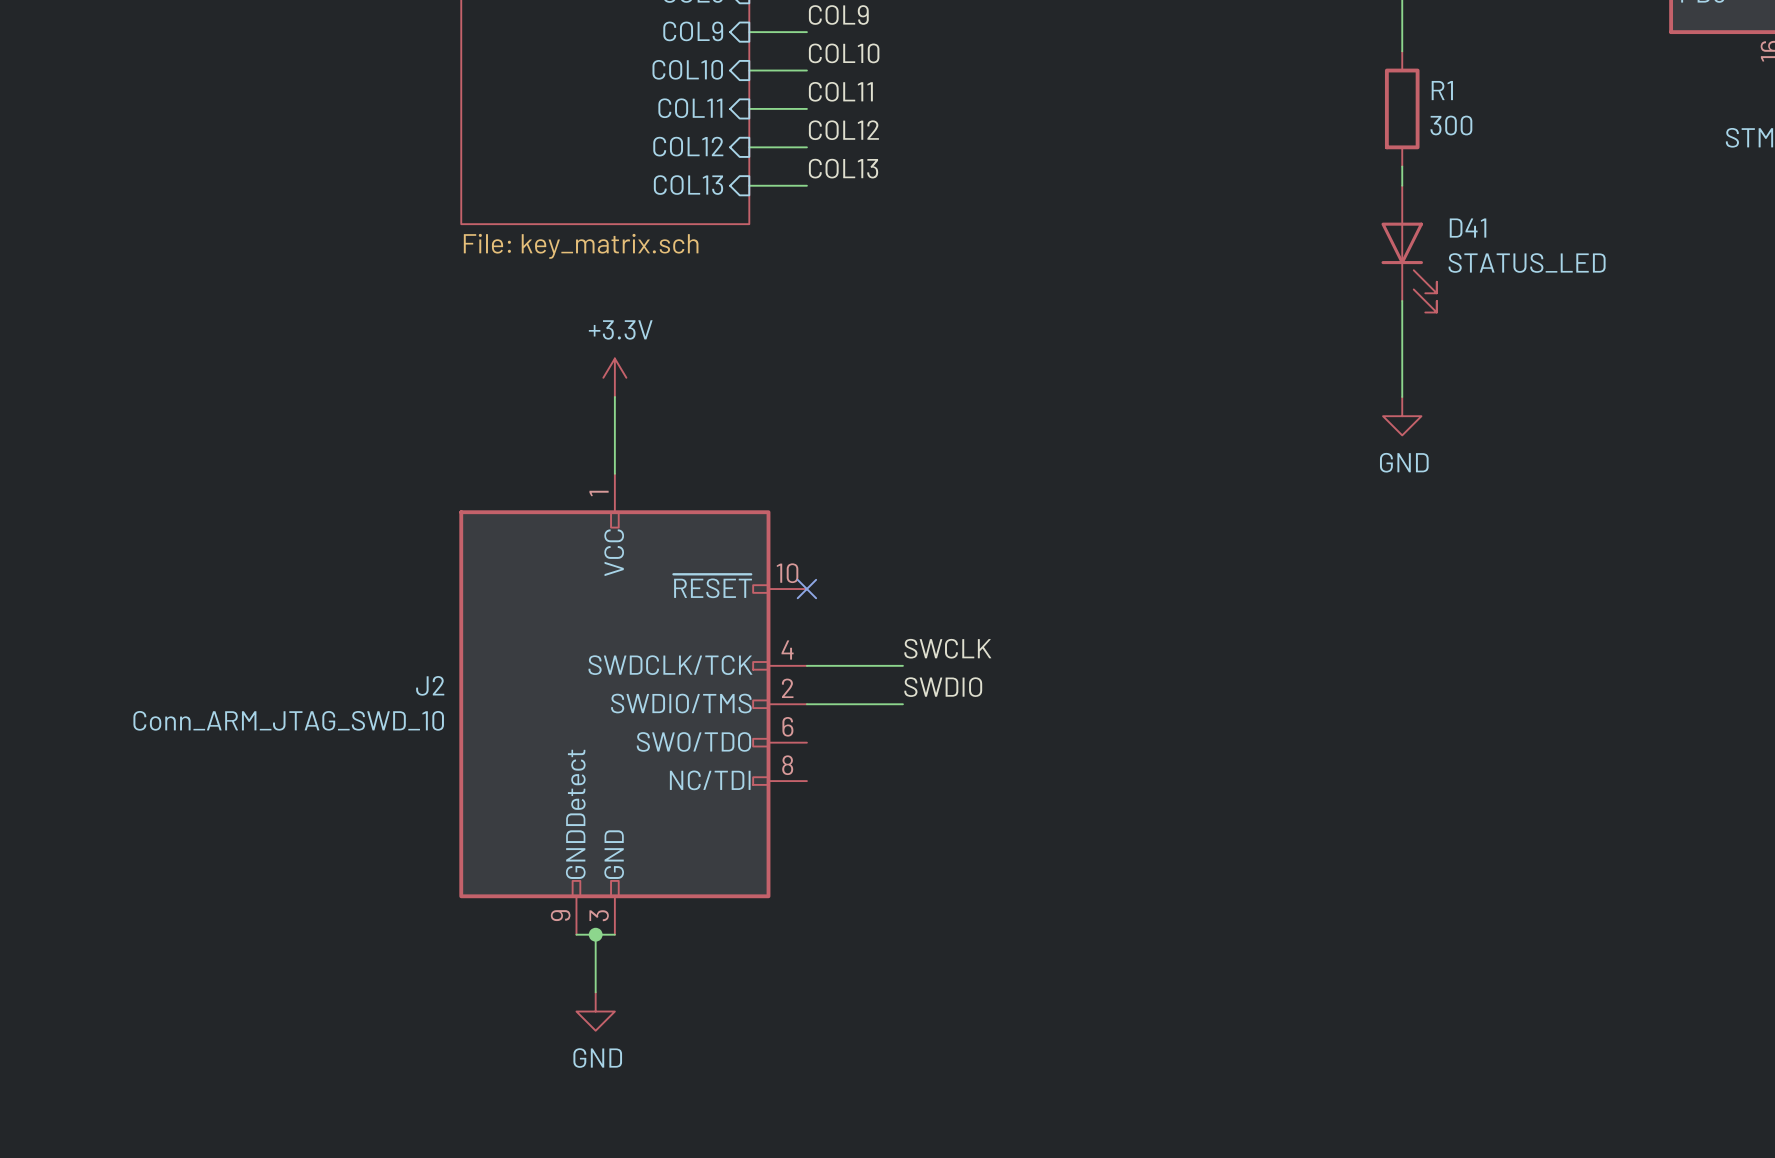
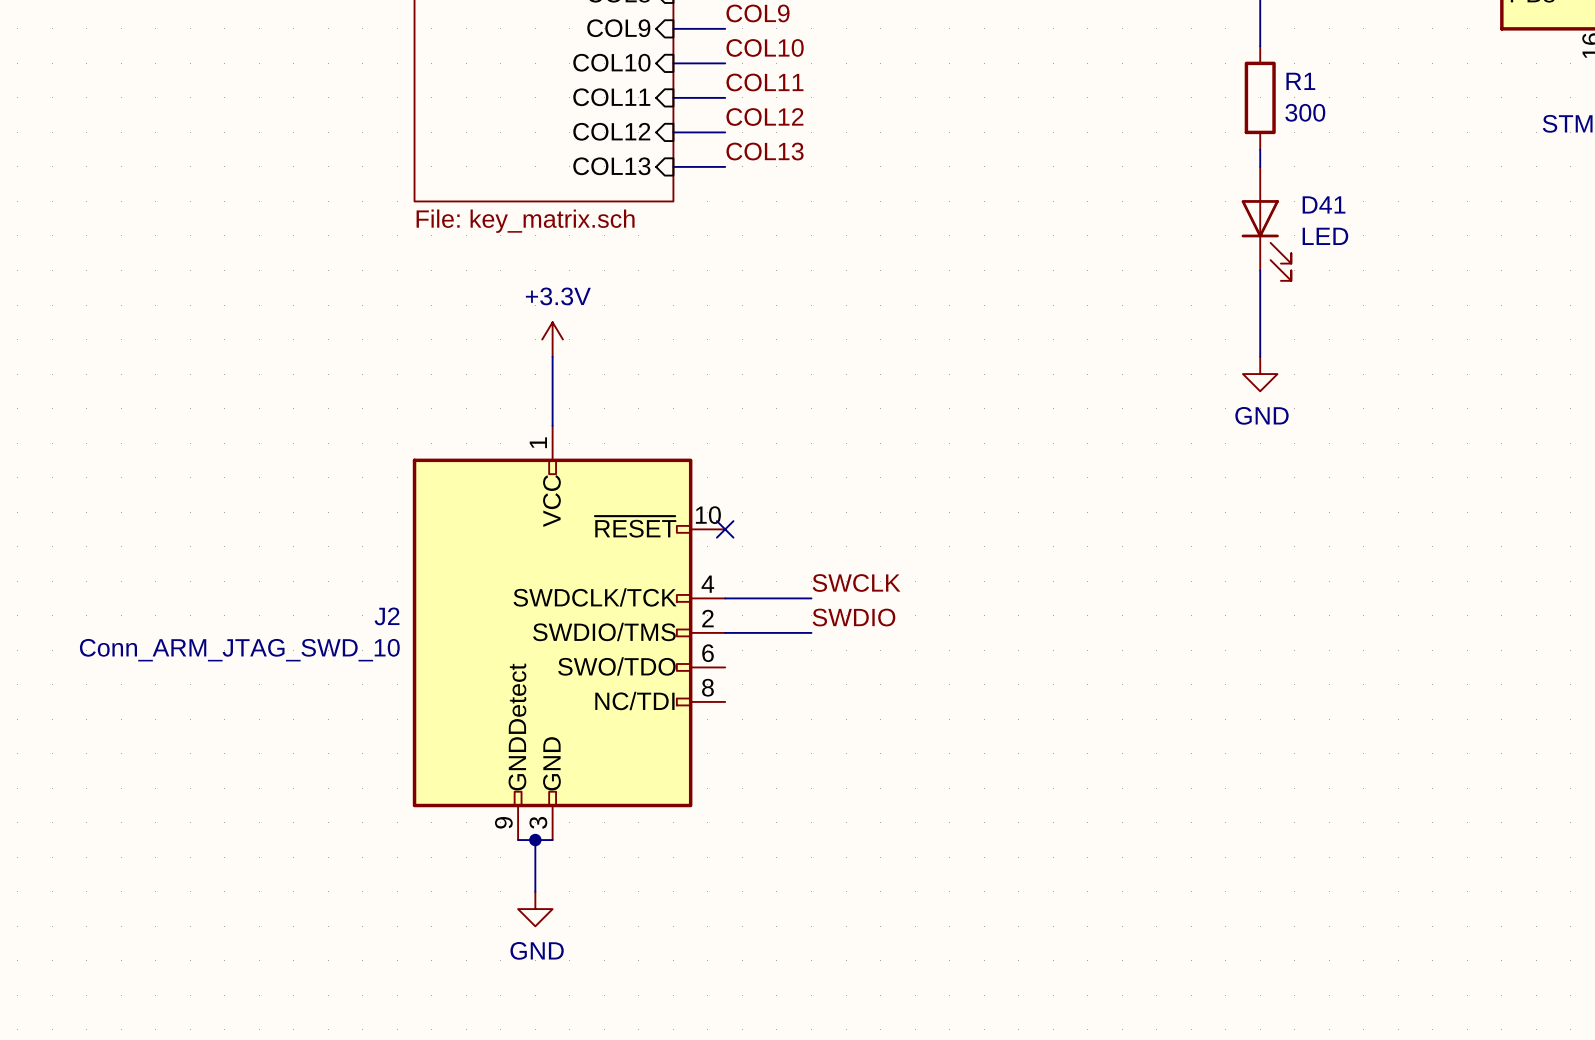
D41 value: STATUS_LED (1527, 263) -> LED (1325, 236)

